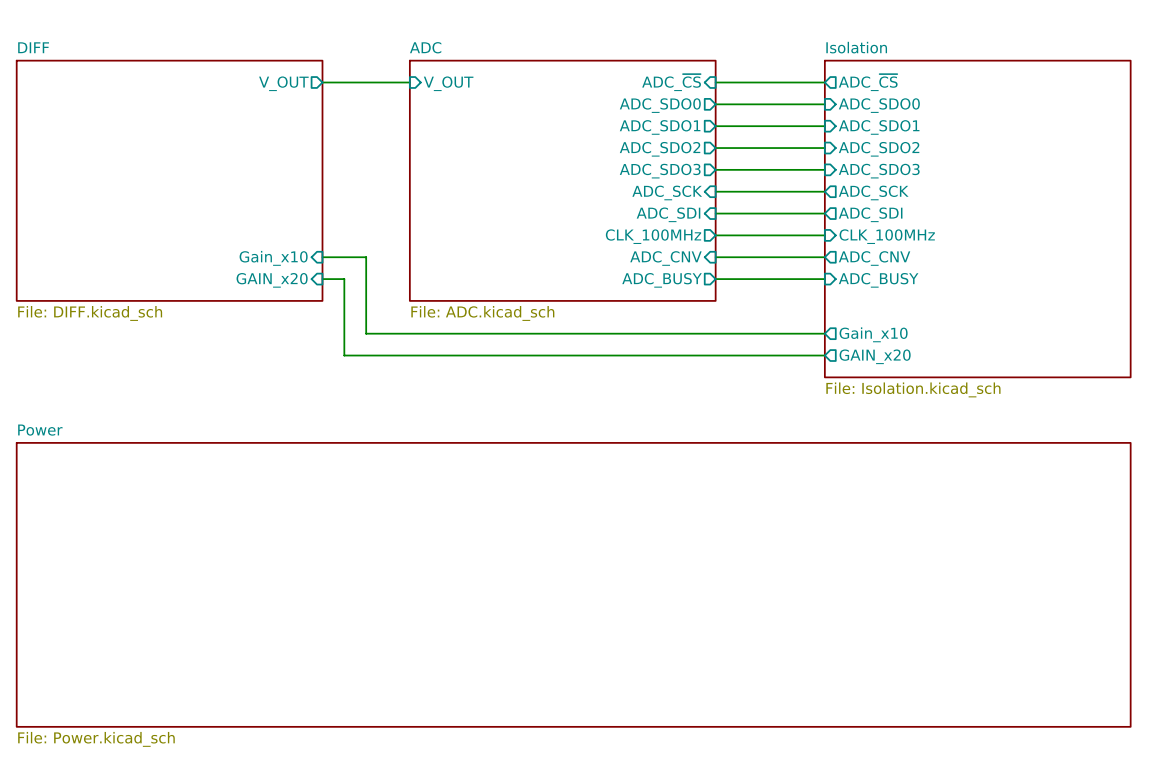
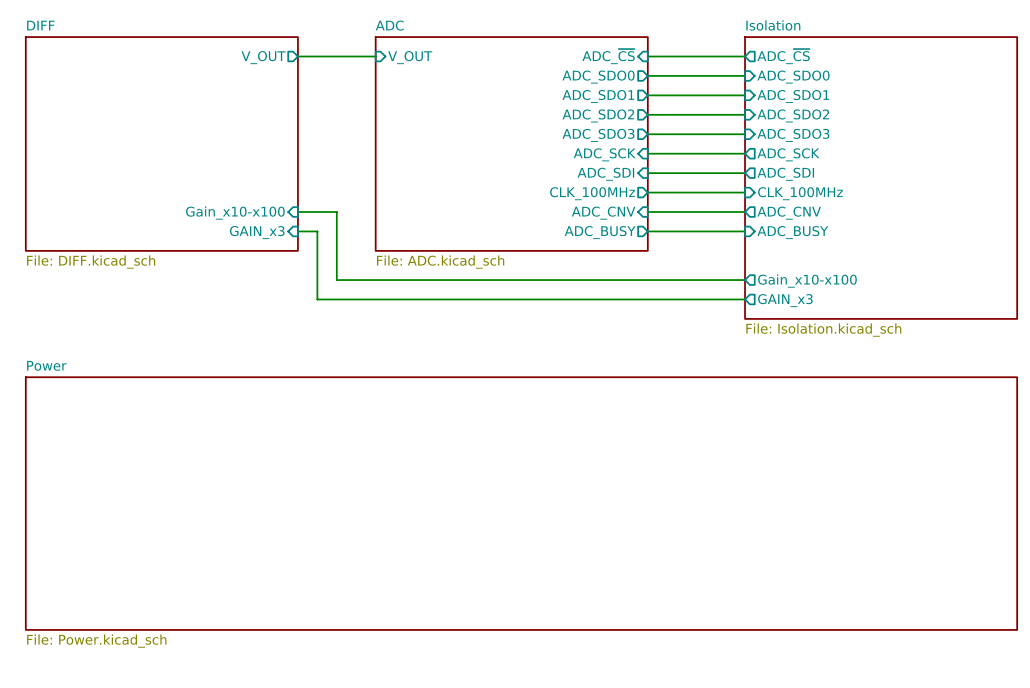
sheet pin: Gain_x10 (273, 258) -> Gain_x10-x100 (235, 213)
sheet pin: GAIN_x20 (272, 280) -> GAIN_x3 (257, 232)
sheet pin: Gain_x10 (873, 334) -> Gain_x10-x100 (807, 281)
sheet pin: GAIN_x20 (875, 356) -> GAIN_x3 (785, 300)

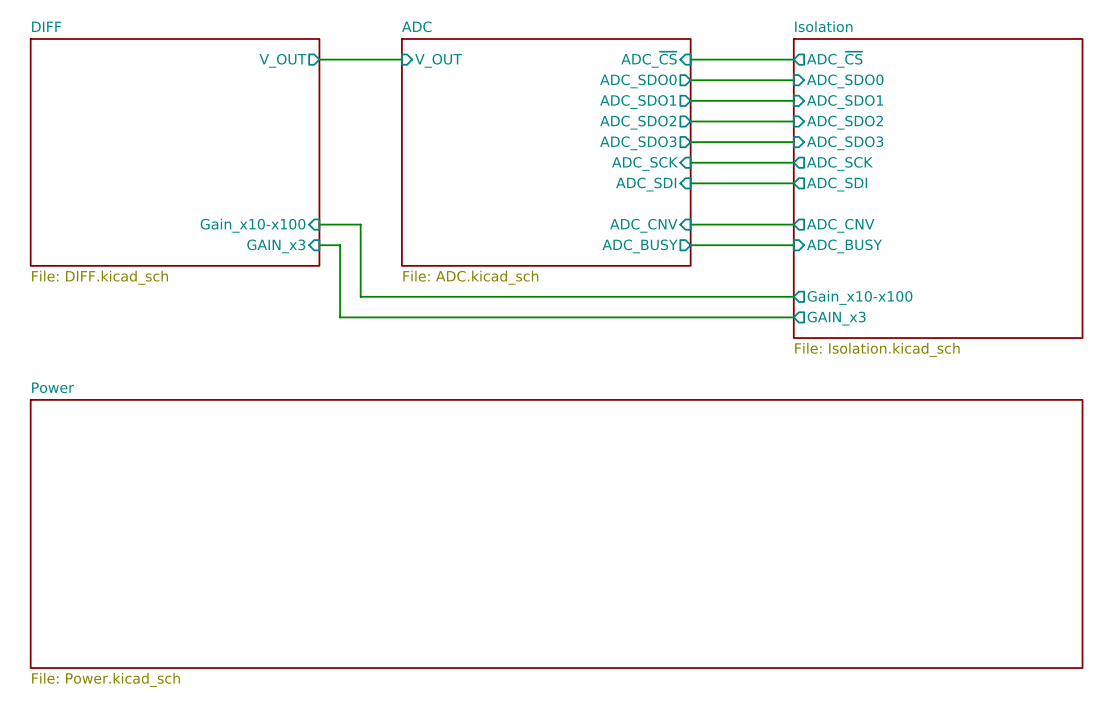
wire: (647, 192) (745, 192) -> none
sheet pin: CLK_100MHz (592, 193) -> none
sheet pin: CLK_100MHz (800, 193) -> none

